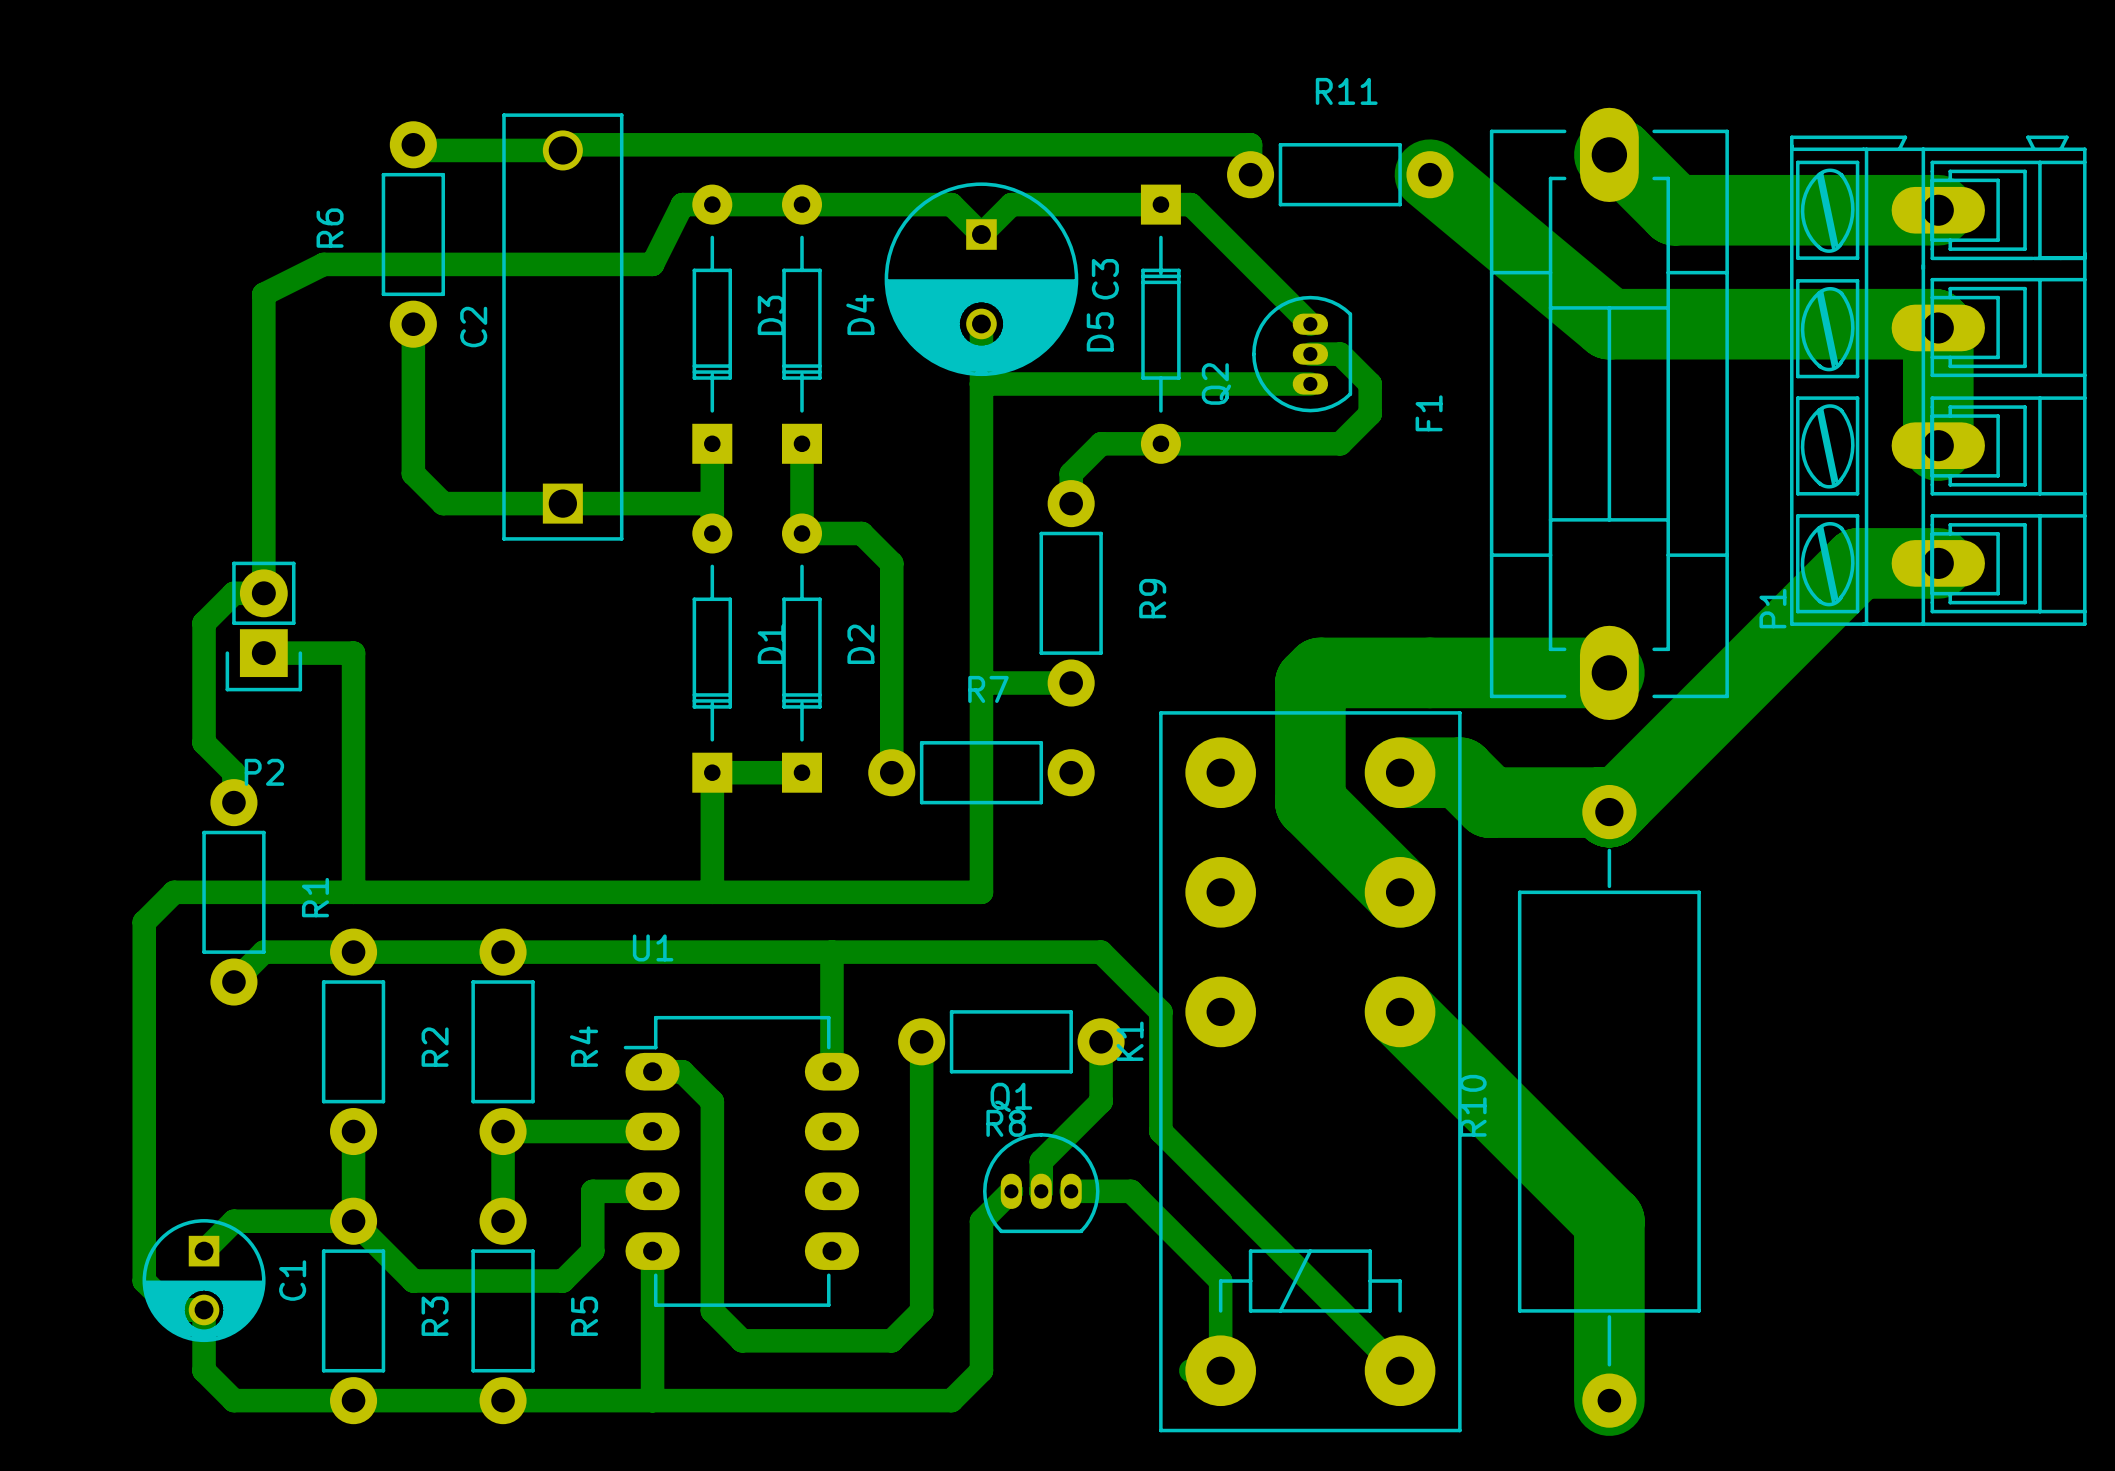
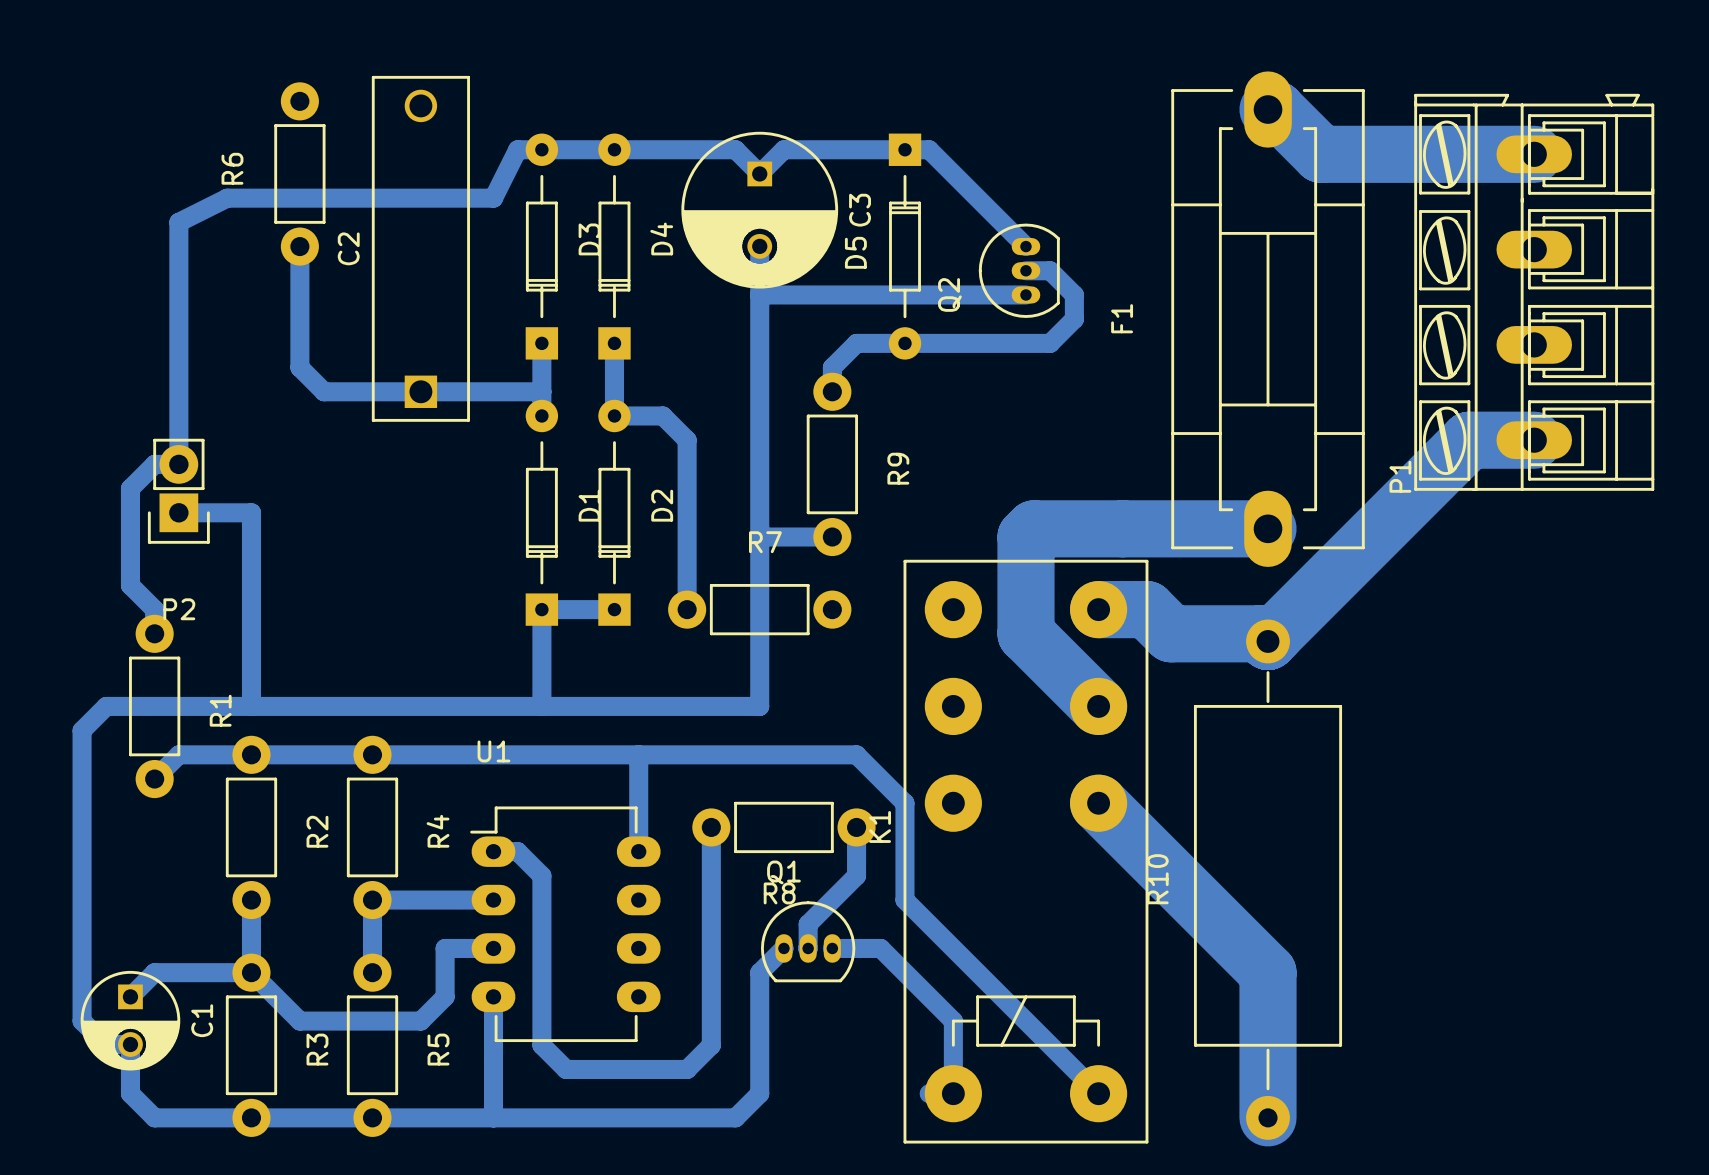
bottom track: (413, 144) (419, 150) (562, 150) (568, 144) (1250, 144) (1250, 174) -> none
R11: (1340, 174) -> none
bottom track: (1429, 174) (1609, 324) (1934, 324) (1938, 327) (1938, 445) -> none

